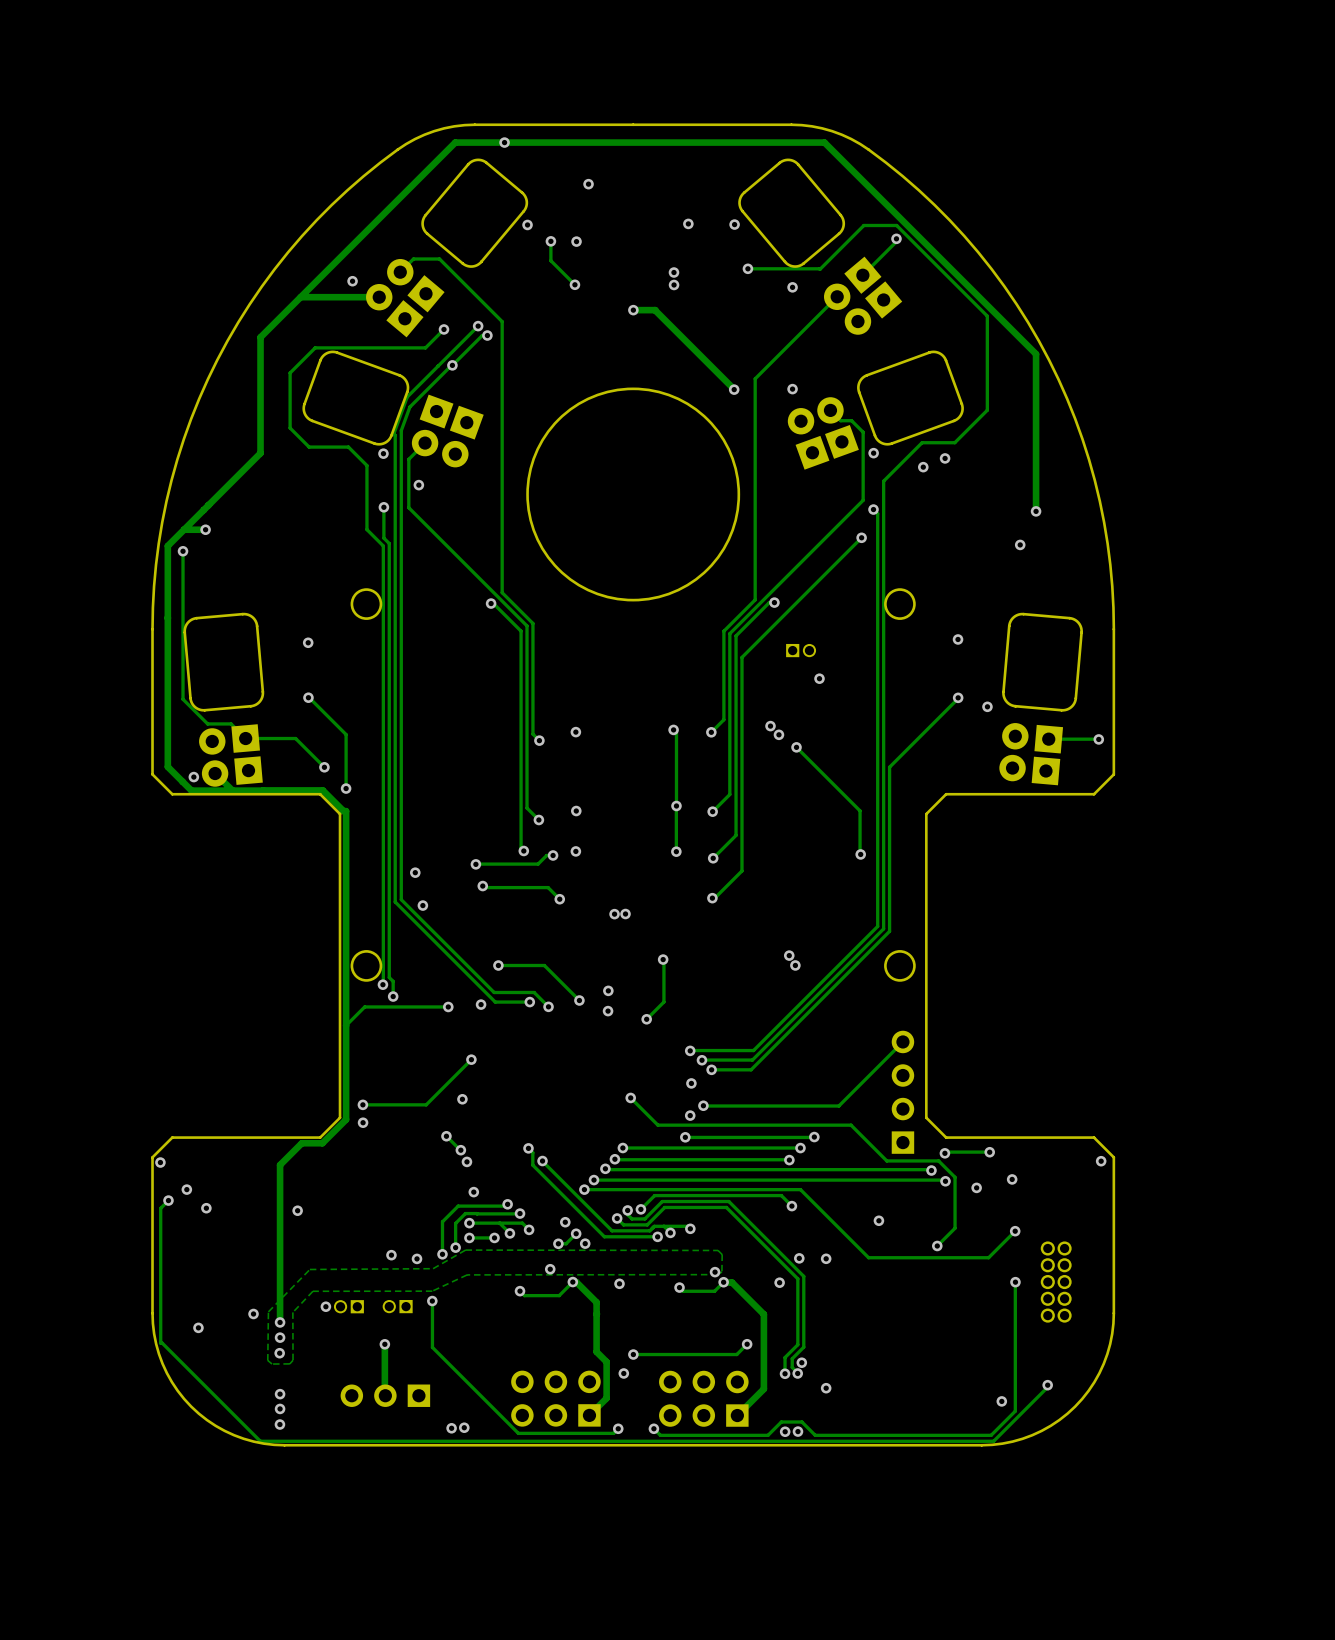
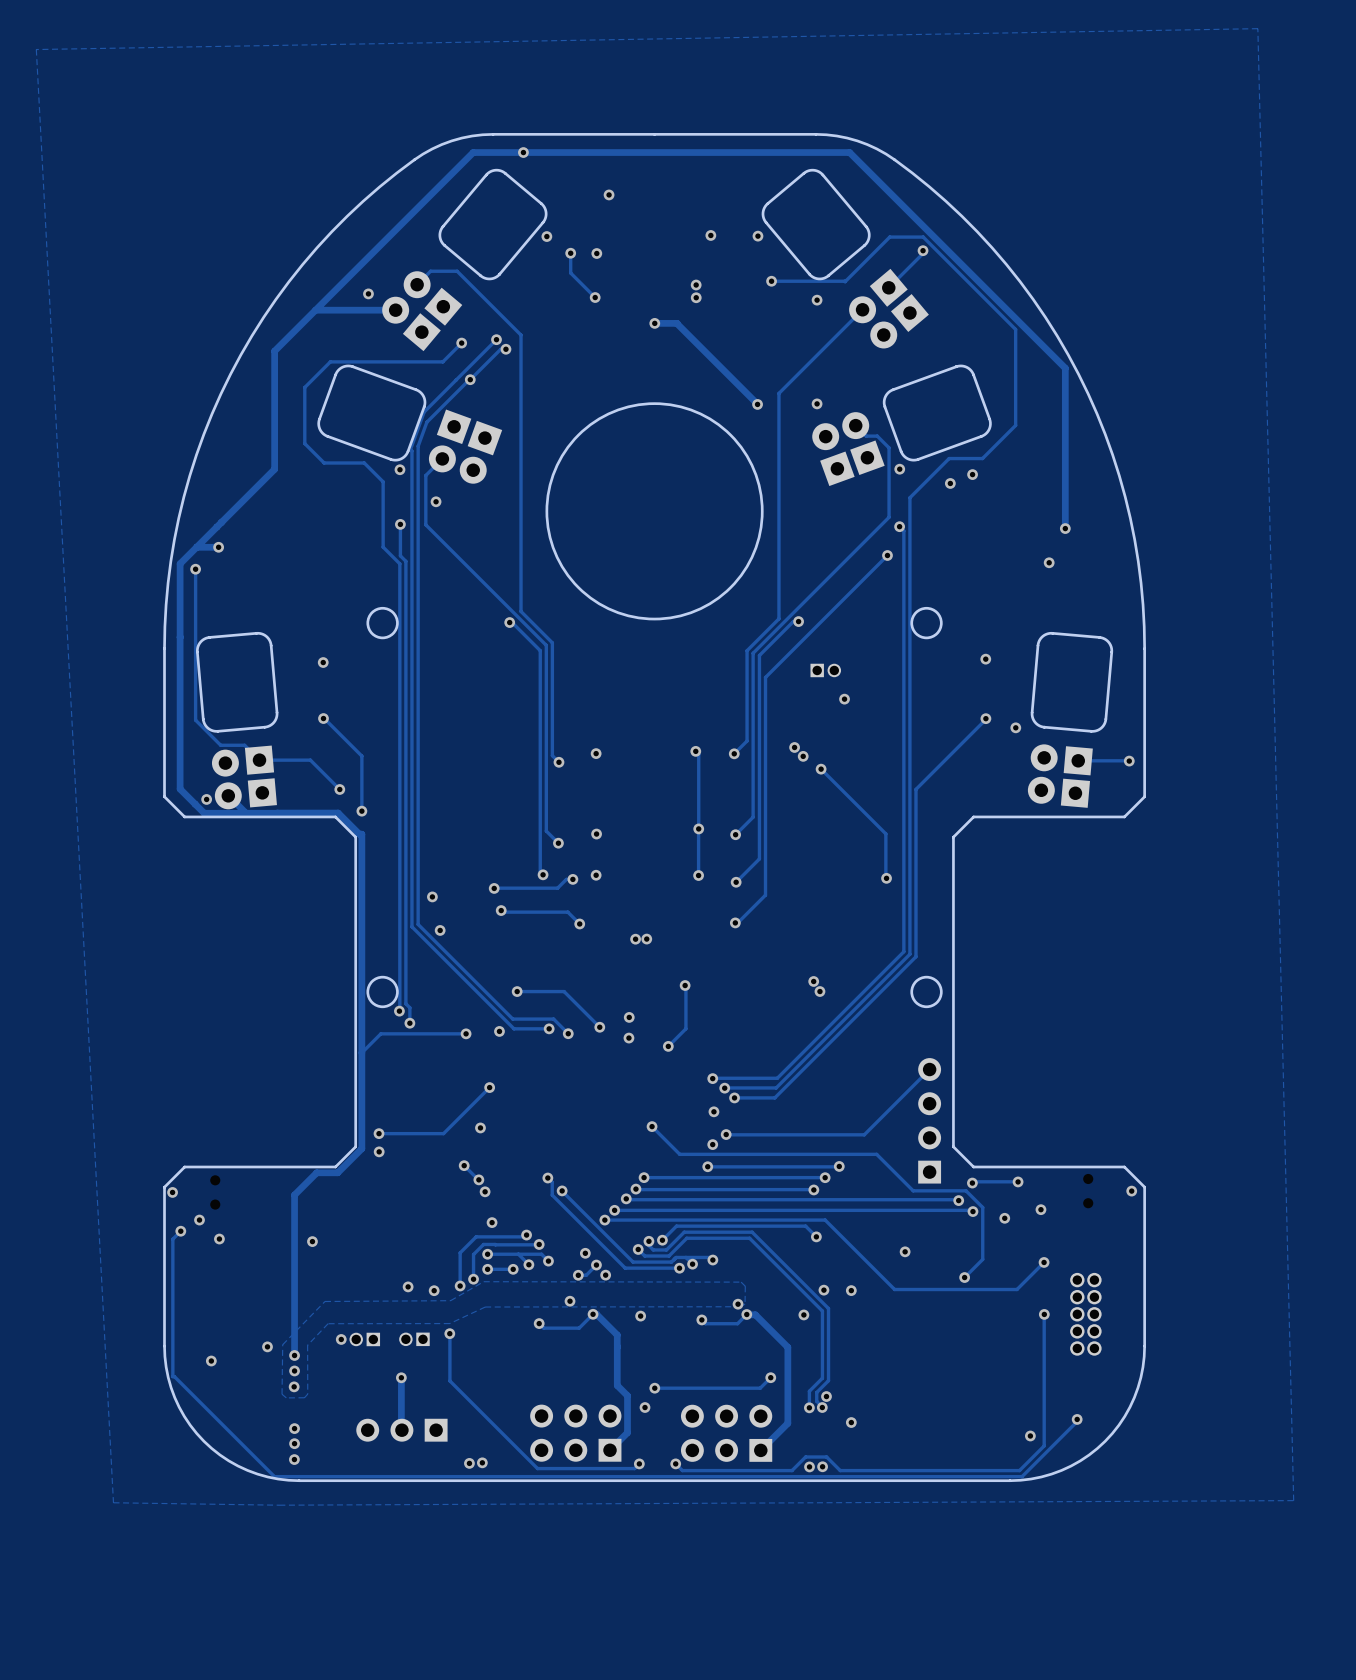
zone outline: none -> (1257, 28) (1293, 1500) (279, 1505) (113, 1502) (36, 49) (1257, 28)

